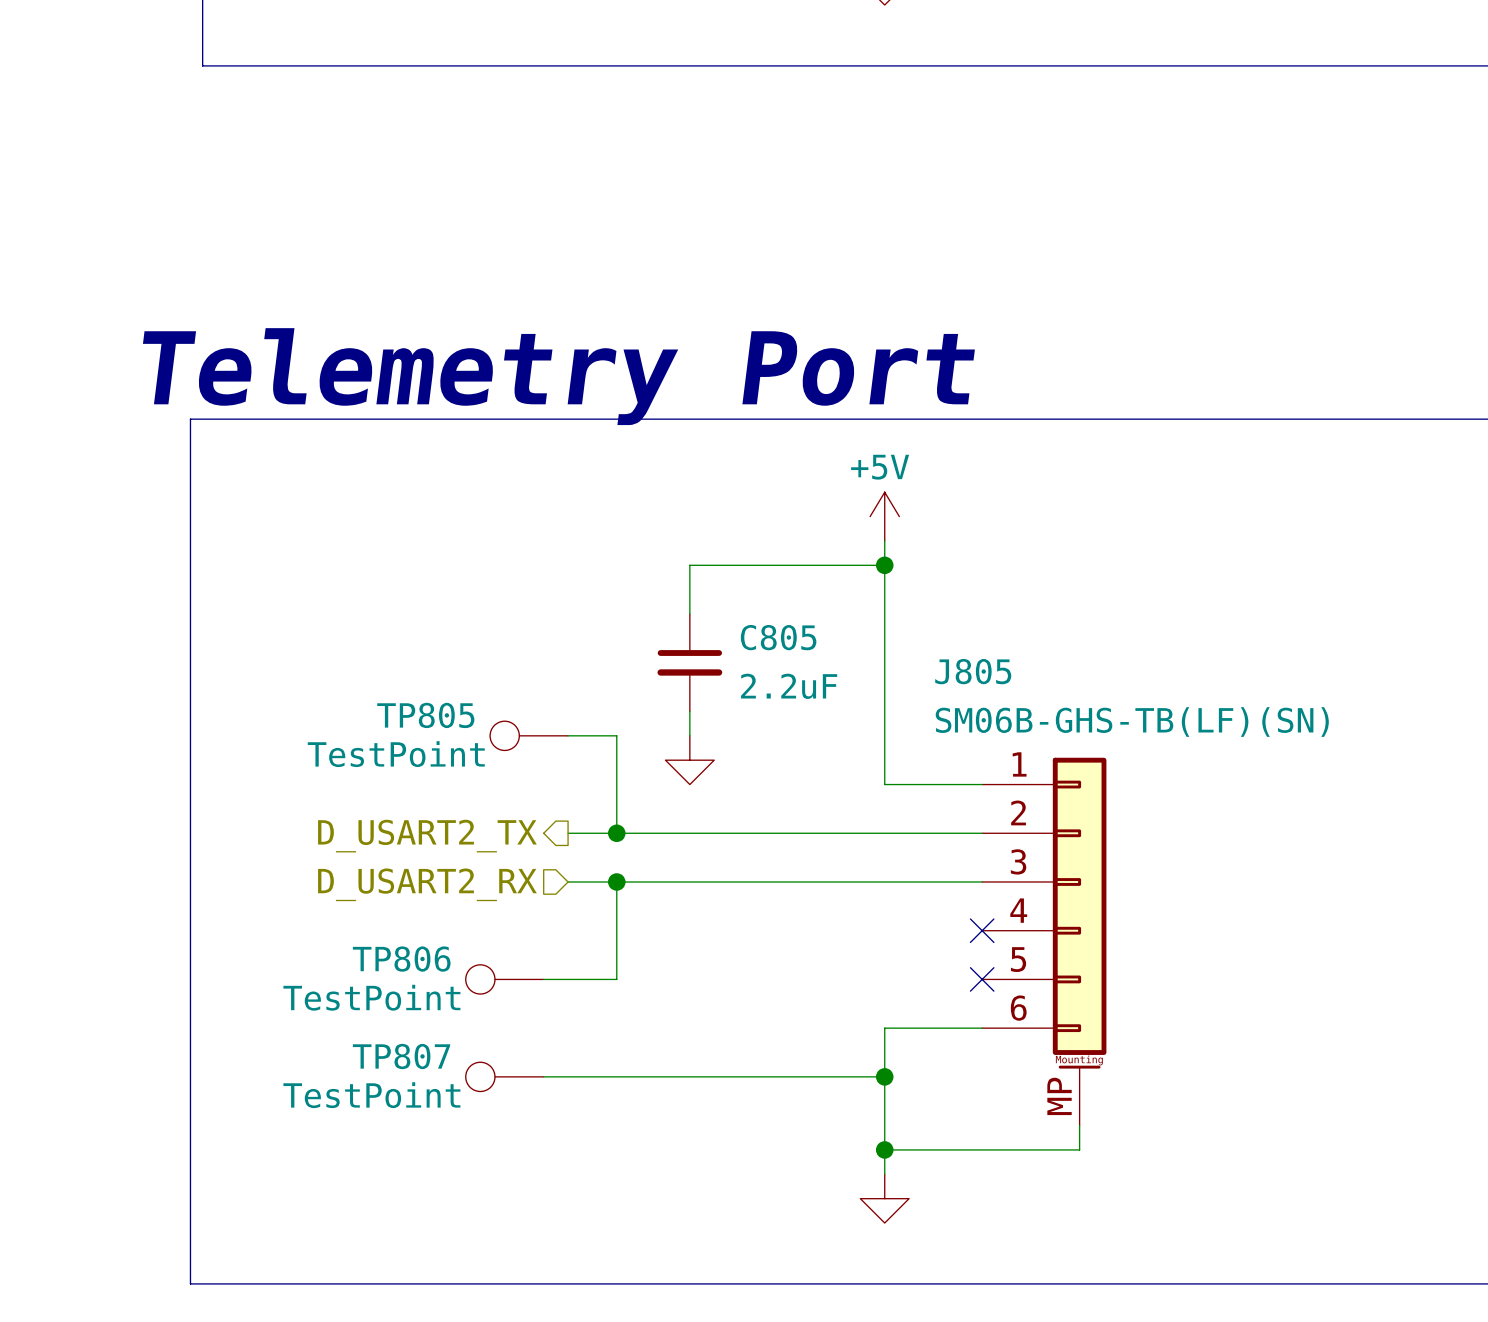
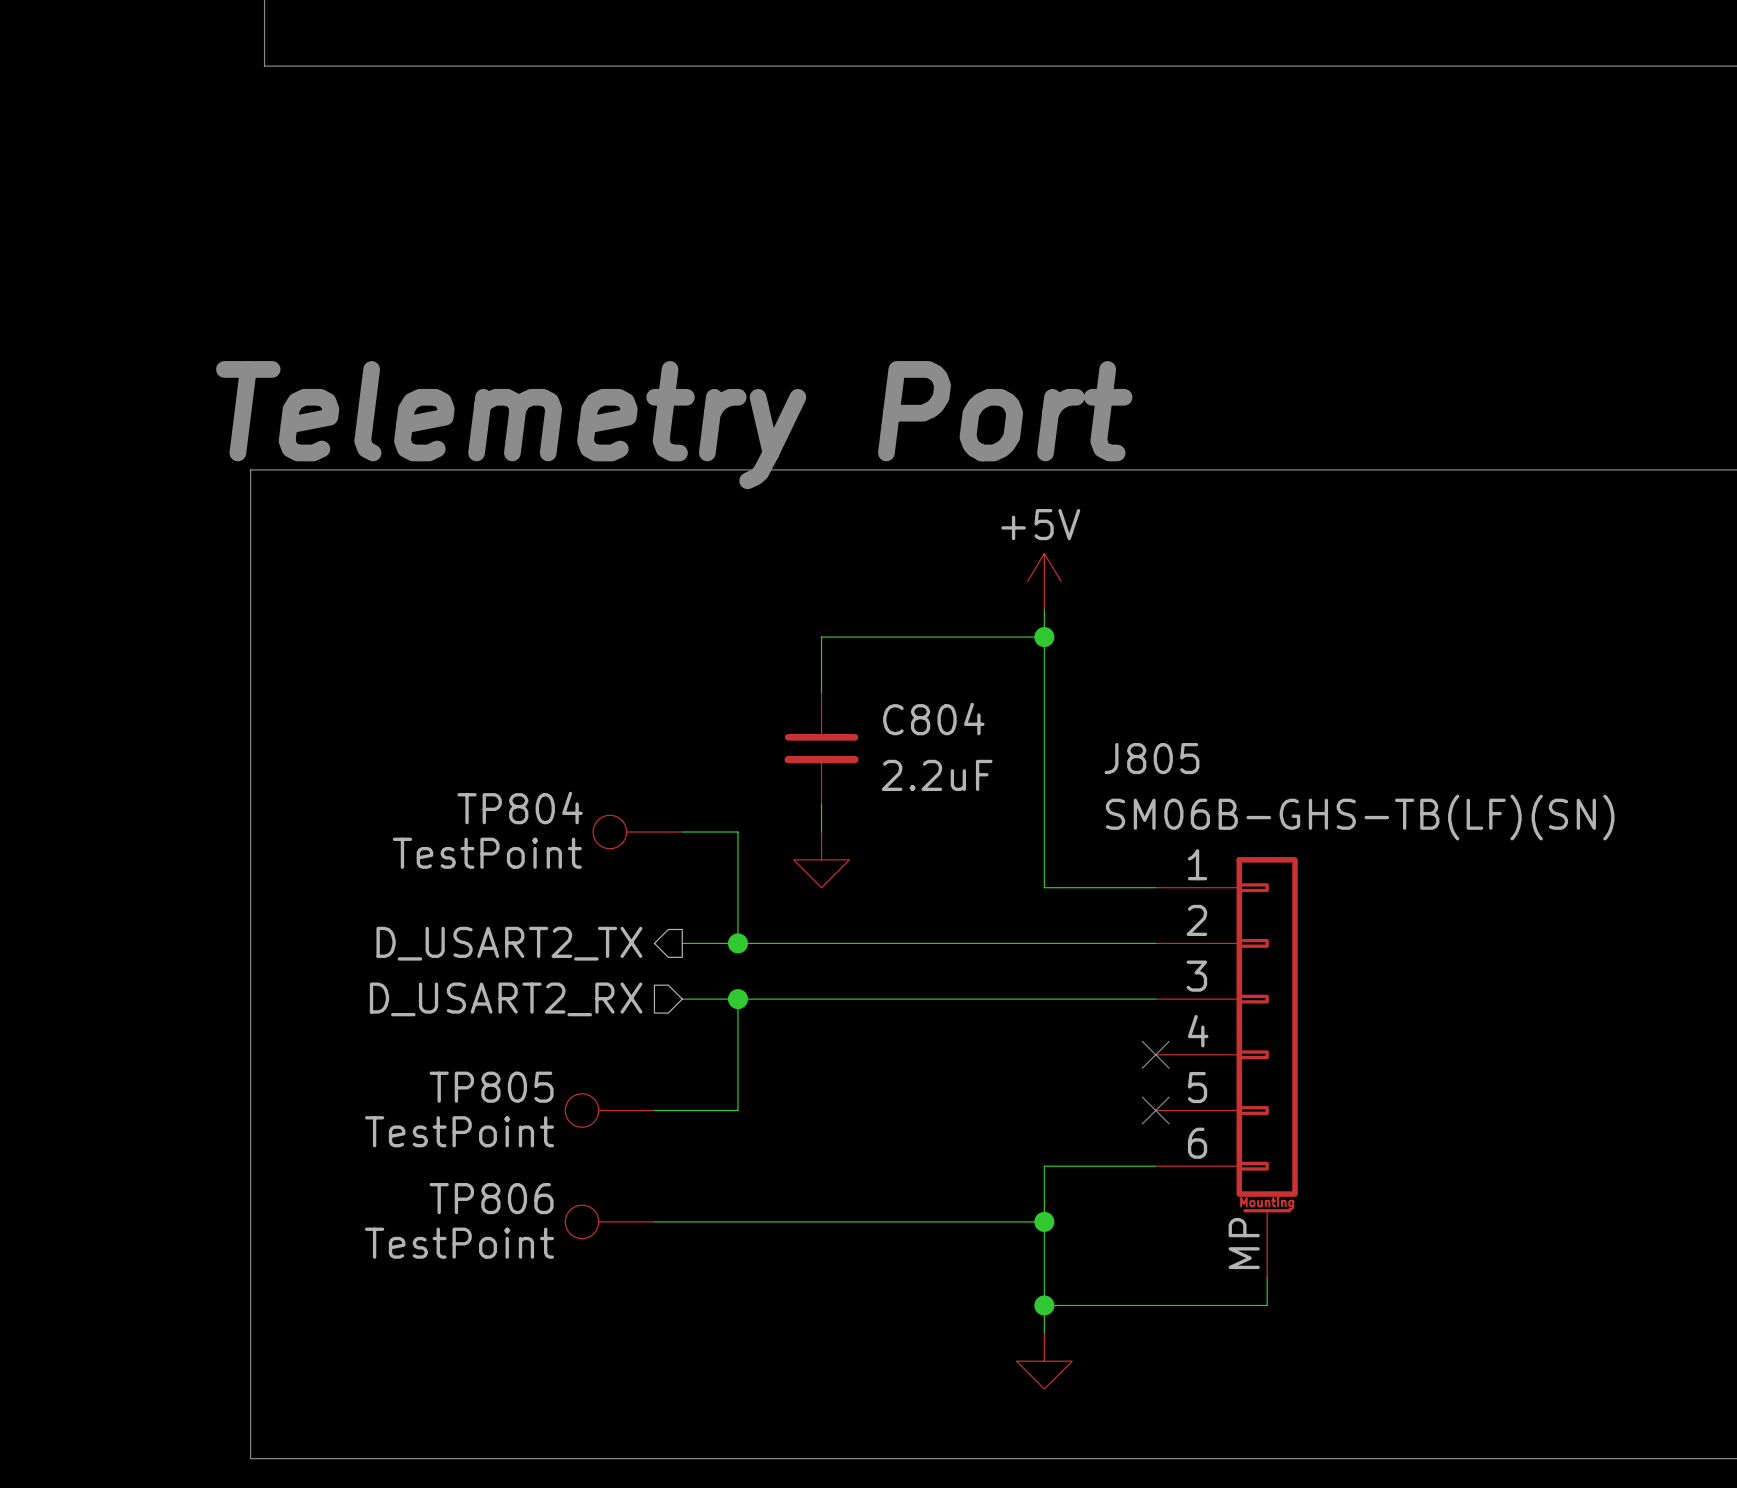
C805 name: C805 (778, 637) -> C804 (933, 719)
TP805 name: TP805 (425, 715) -> TP804 (520, 808)
TP806 name: TP806 (401, 959) -> TP805 (491, 1087)
TP807 name: TP807 (401, 1056) -> TP806 (491, 1198)

